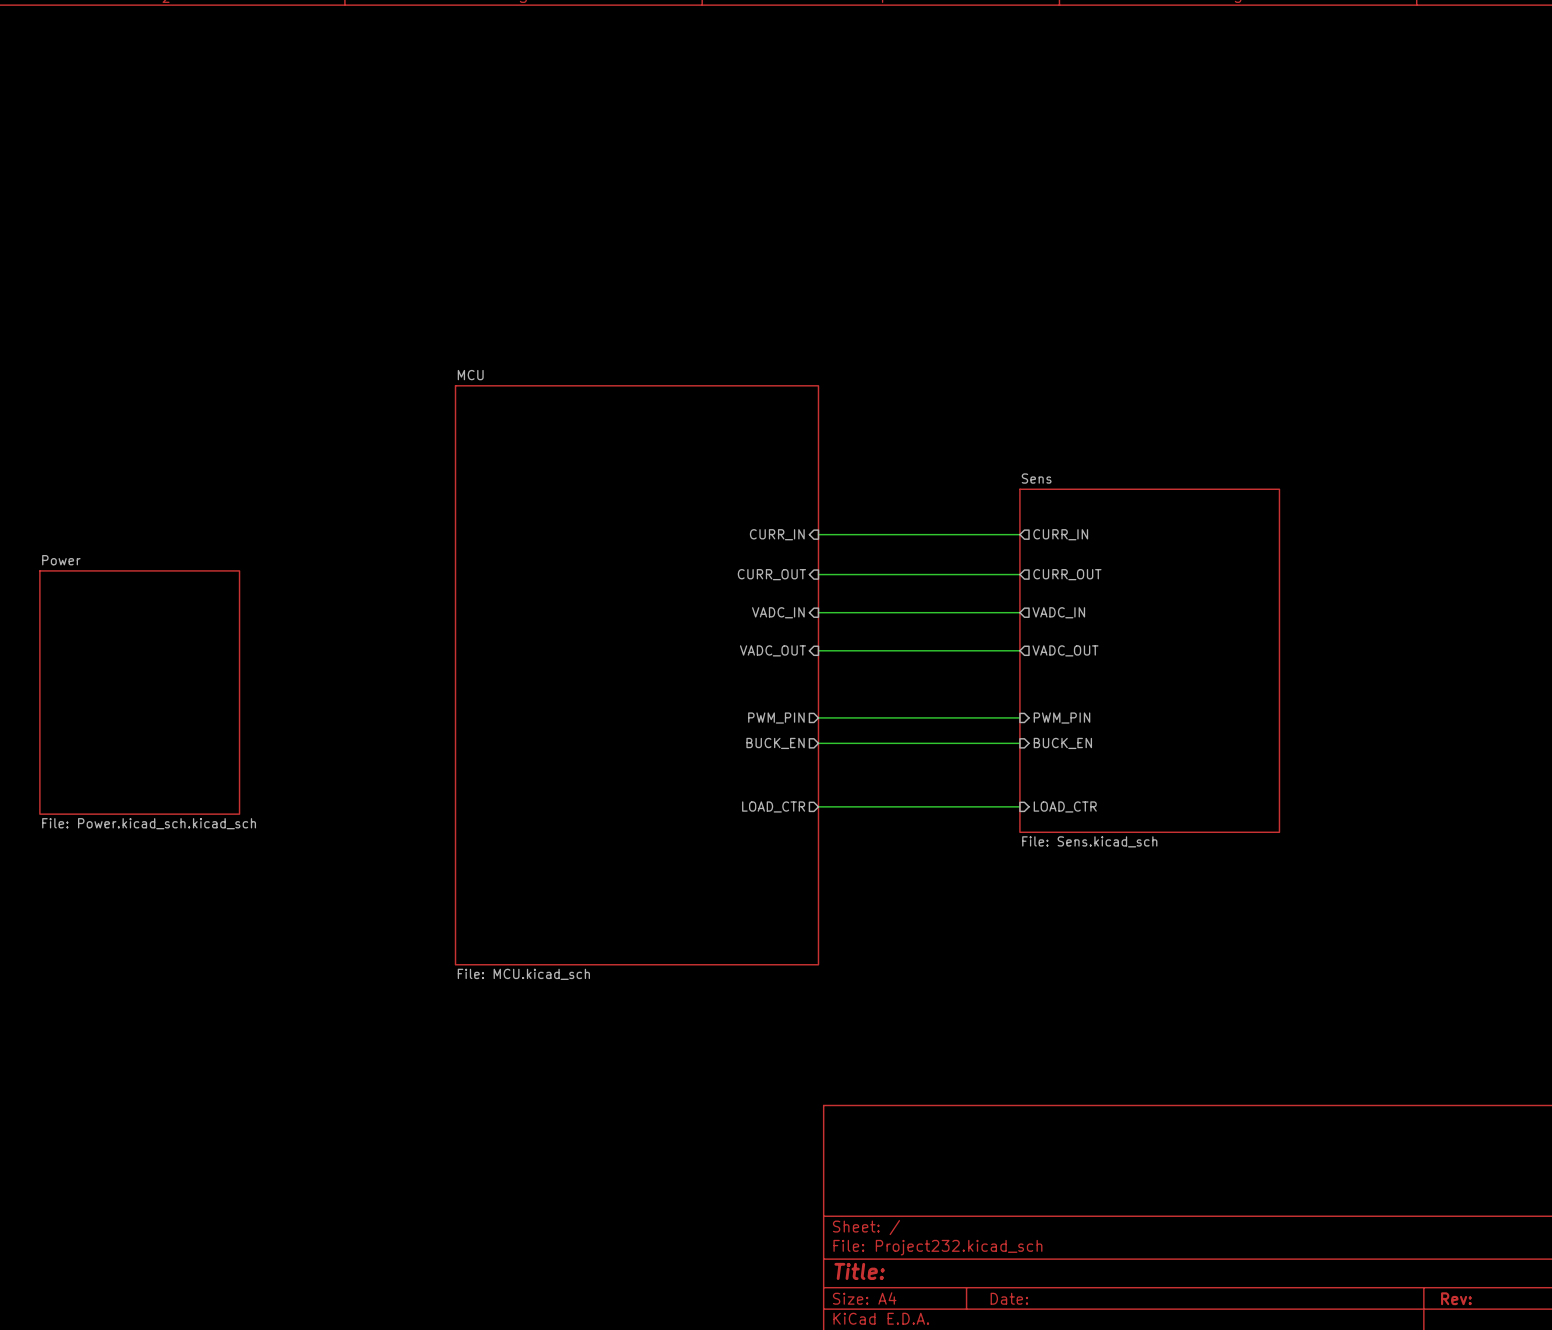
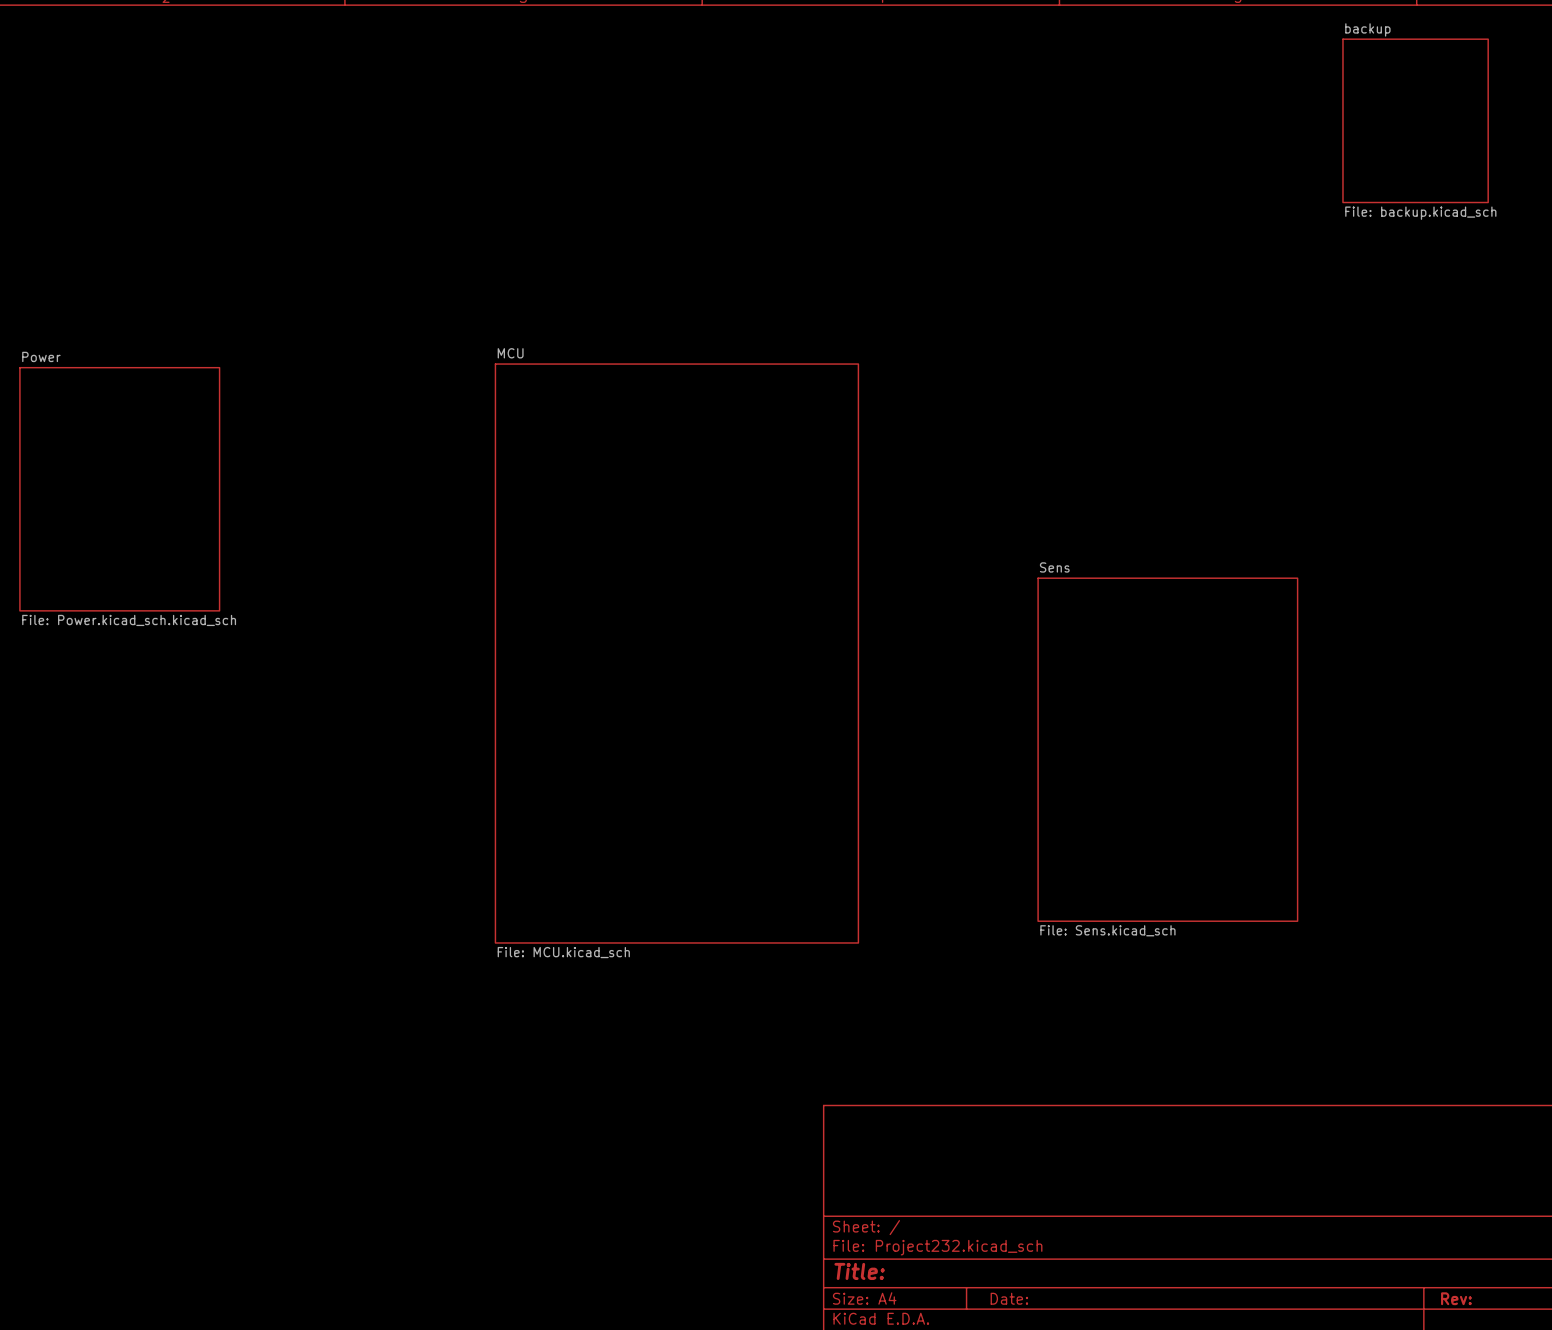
sheet backup: none -> File: backup.kicad_sch (1415, 120)
sheet Power: none -> File: Power.kicad_sch.kicad_sch (119, 489)
sheet pin: CURR_IN (777, 534) -> none
wire: (818, 534) (1019, 534) -> none
sheet pin: CURR_IN (1060, 534) -> none
sheet pin: CURR_OUT (771, 574) -> none
wire: (818, 574) (1019, 574) -> none
sheet pin: CURR_OUT (1067, 574) -> none
sheet pin: VADC_IN (778, 612) -> none
wire: (818, 612) (1019, 612) -> none
sheet pin: VADC_IN (1058, 612) -> none
sheet pin: VADC_OUT (772, 650) -> none
wire: (818, 650) (1019, 650) -> none
sheet pin: VADC_OUT (1065, 650) -> none
sheet Sens position: (1149, 660) -> (1167, 749)
sheet MCU position: (636, 675) -> (676, 653)
sheet Power: File: Power.kicad_sch.kicad_sch (139, 692) -> none
wire: (818, 717) (1019, 717) -> none
sheet pin: PWM_PIN (776, 718) -> none
sheet pin: PWM_PIN (1061, 718) -> none
sheet pin: BUCK_EN (775, 743) -> none
wire: (818, 743) (1019, 743) -> none
sheet pin: BUCK_EN (1062, 743) -> none
sheet pin: LOAD_CTR (773, 806) -> none
wire: (818, 806) (1019, 806) -> none
sheet pin: LOAD_CTR (1065, 806) -> none

